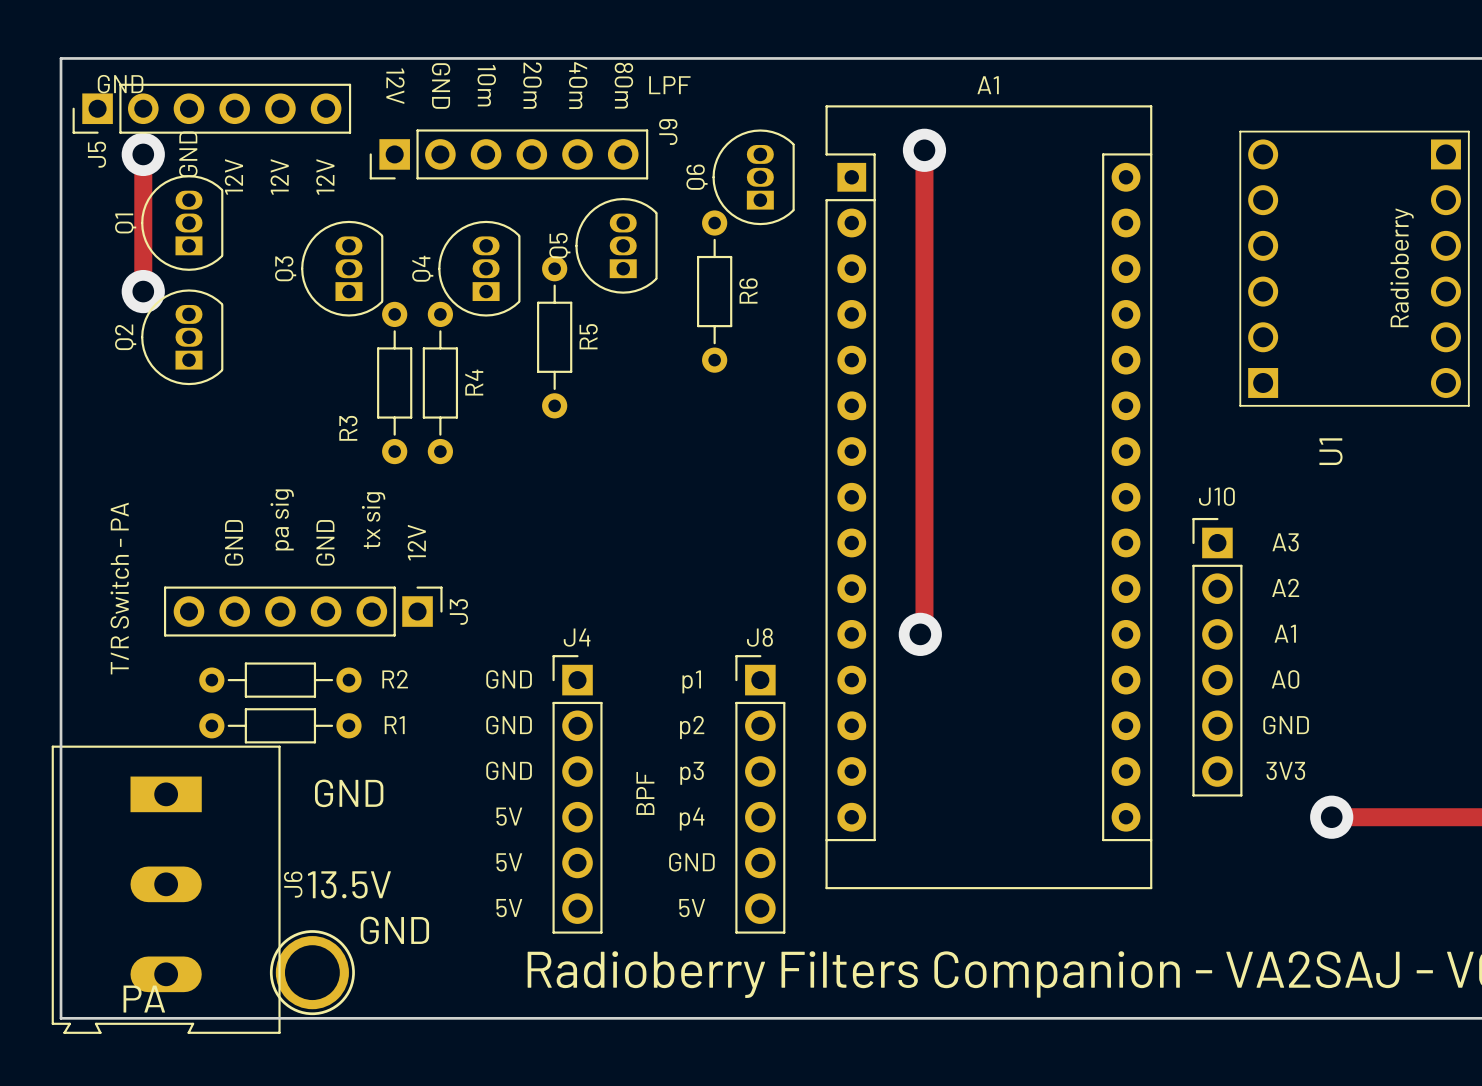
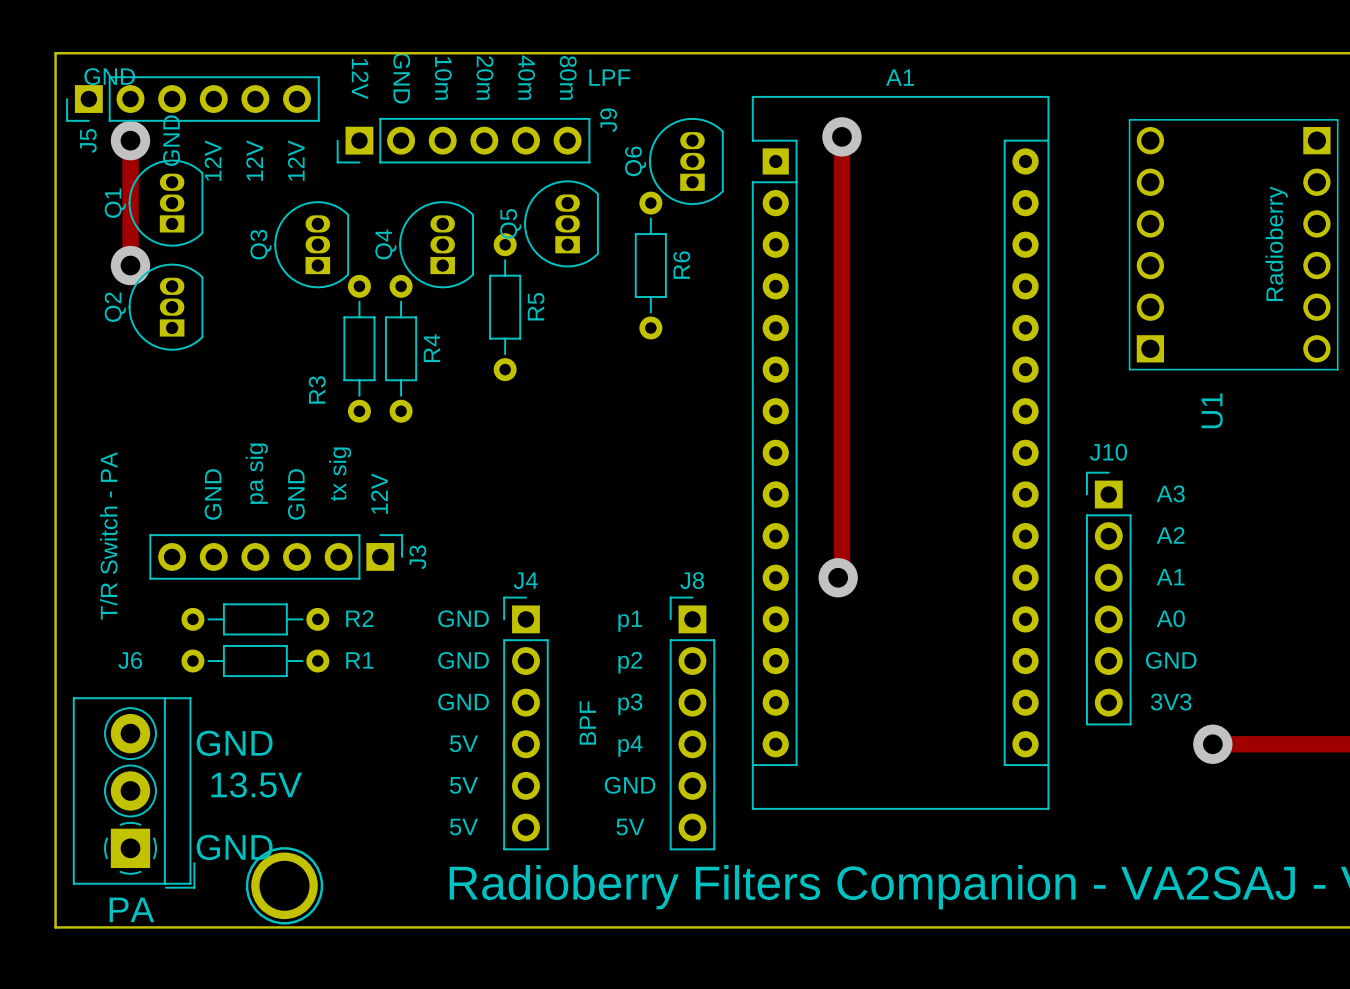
J6 footprint: [51, 745, 281, 1034] -> [72, 697, 196, 889]
text position: GND (349, 793) -> GND (234, 743)
J6 name position: J6 (293, 884) -> J6 (130, 660)
text position: 13.5V (349, 884) -> 13.5V (256, 784)
text: none -> GND (234, 847)
text: GND (394, 930) -> none

